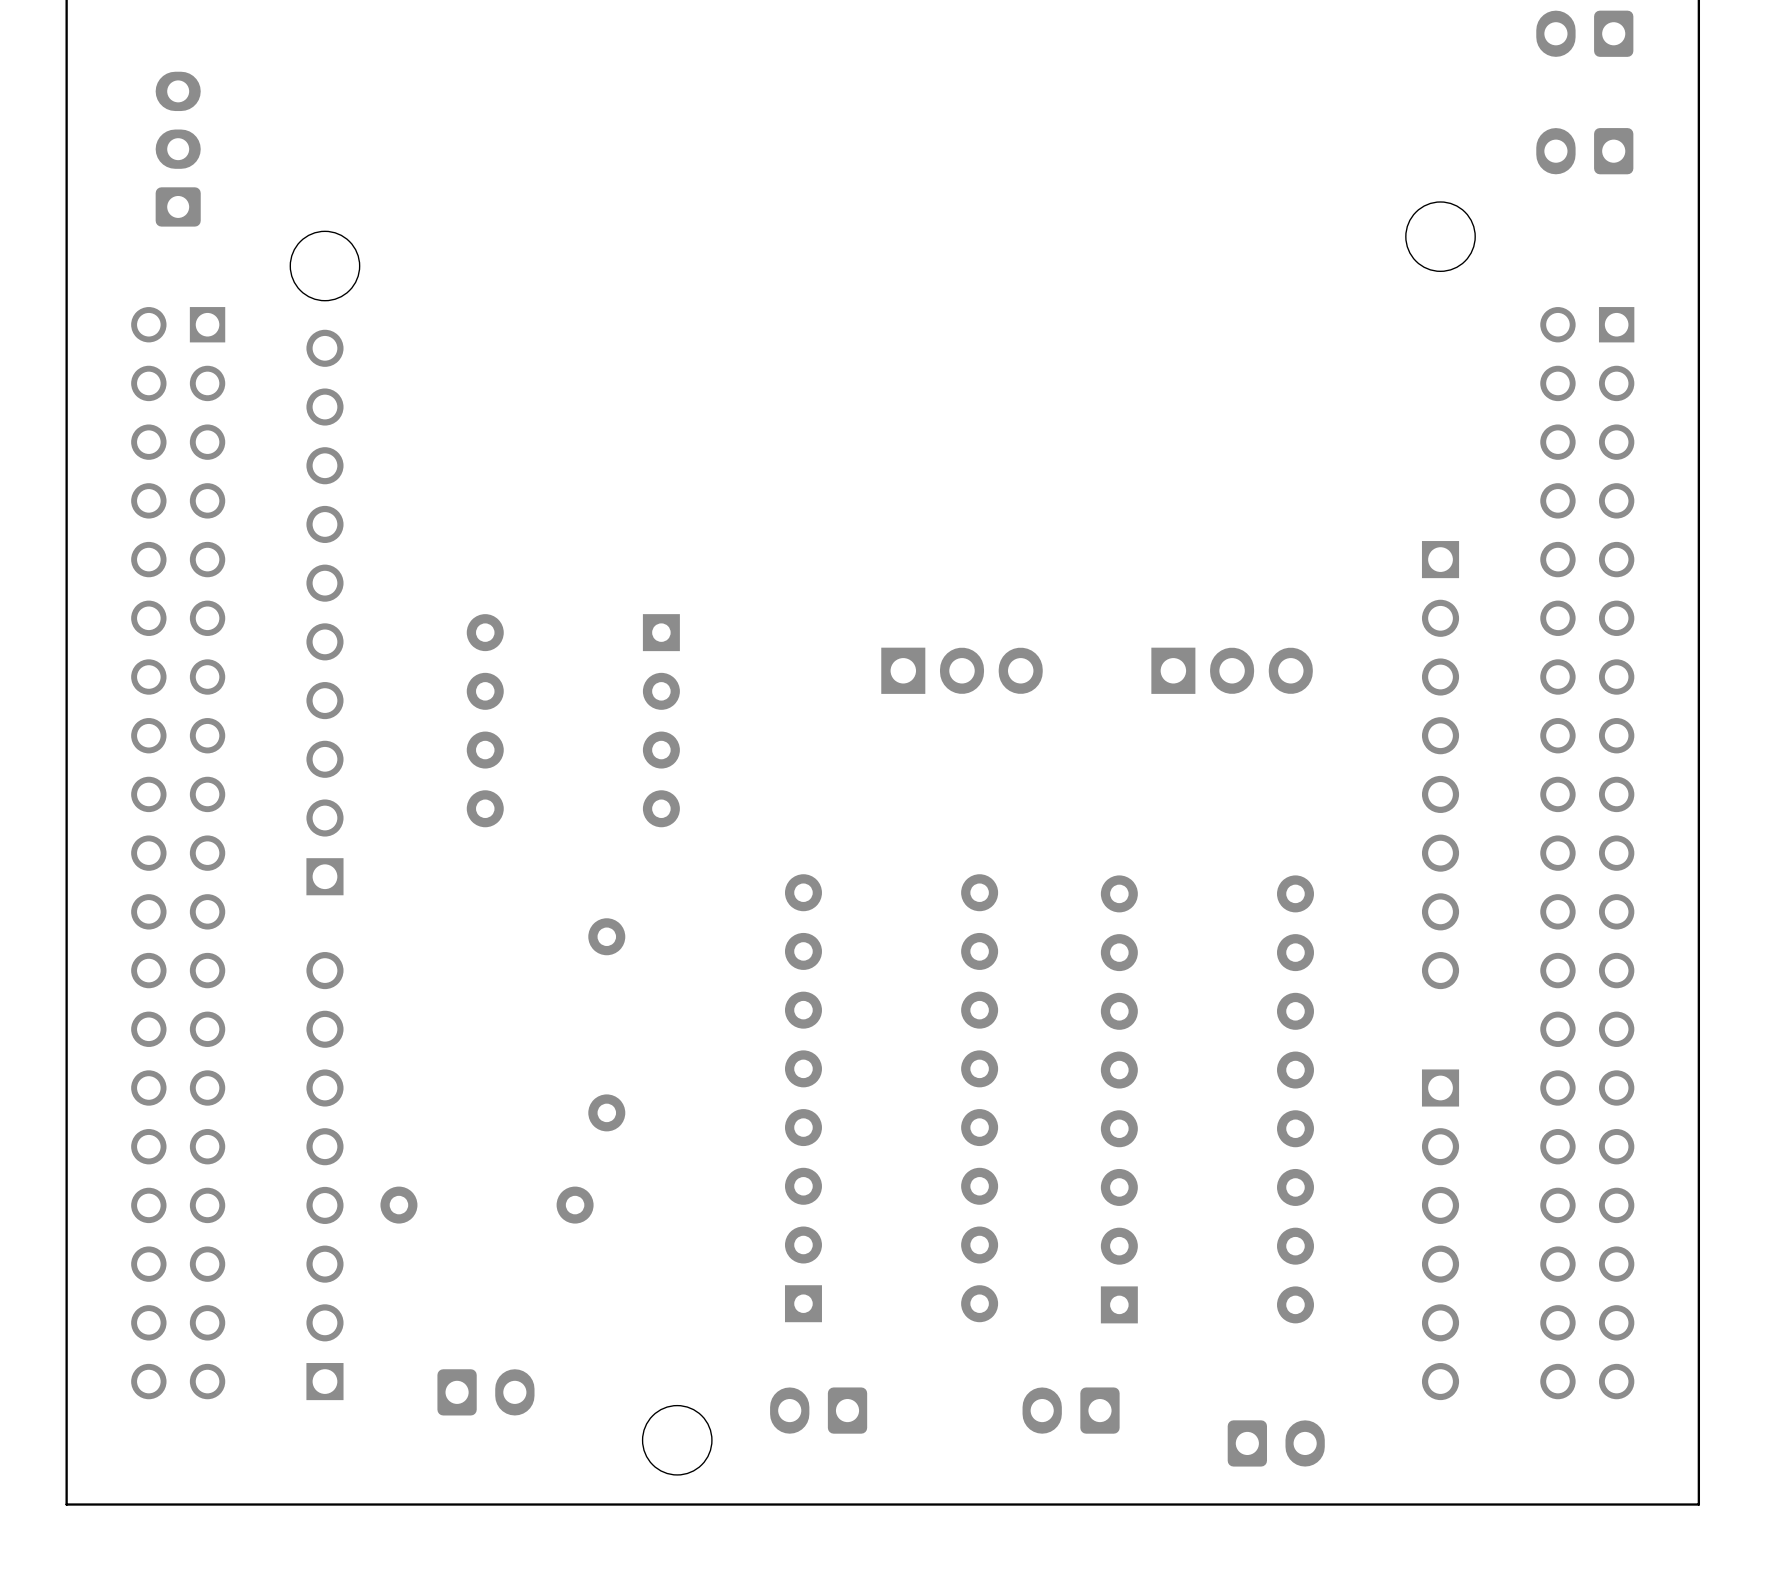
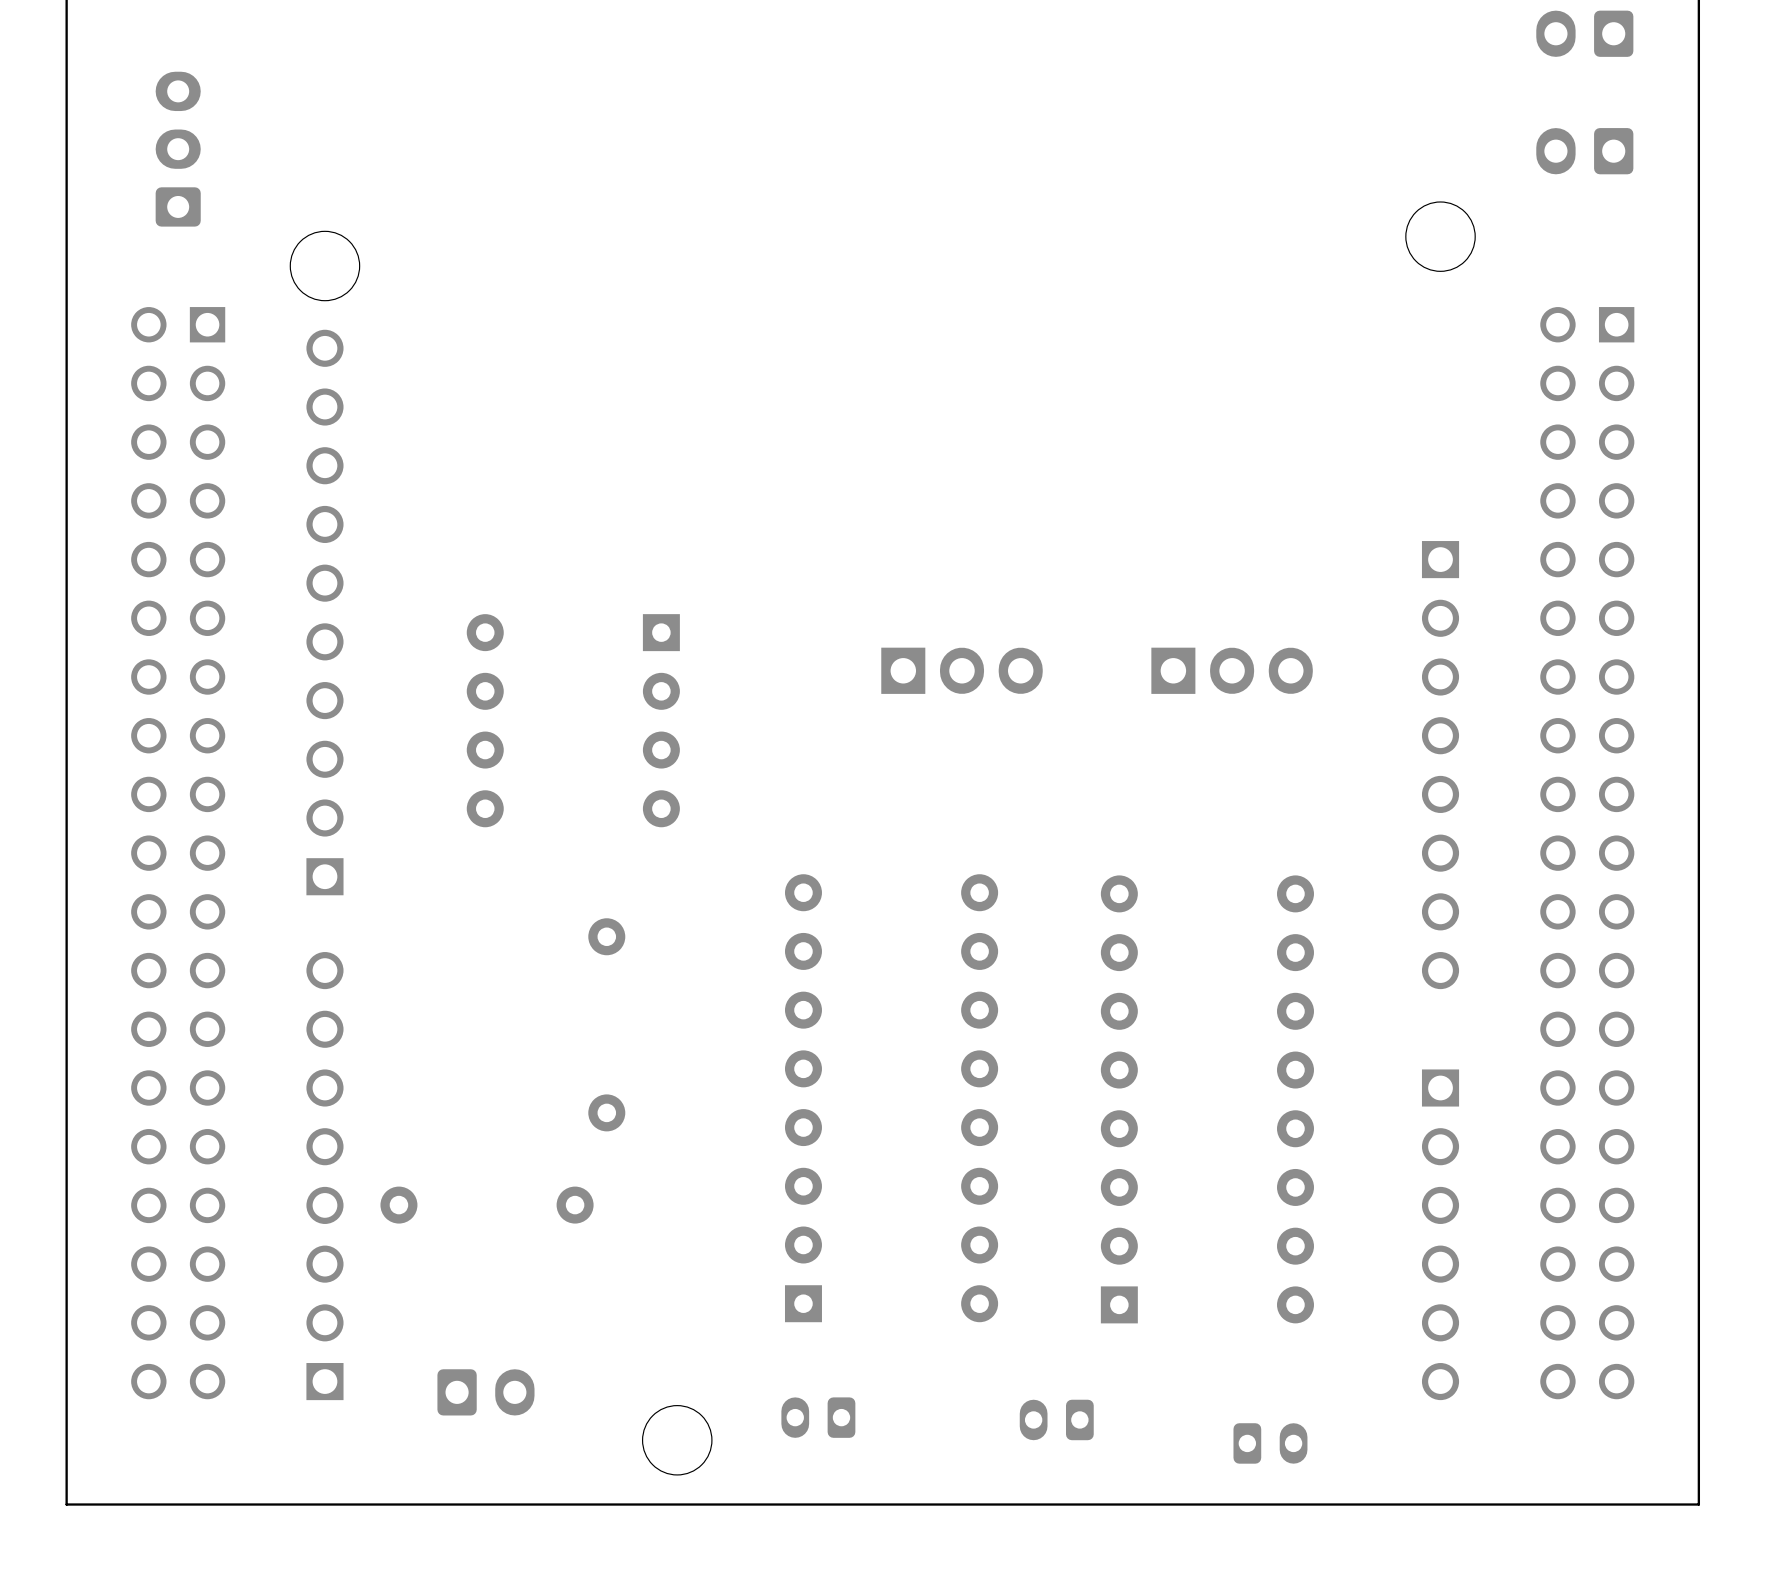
part footprint: [770, 1387, 868, 1434] -> [781, 1397, 856, 1438]
part footprint: [1022, 1387, 1120, 1434] -> [1019, 1399, 1094, 1441]
part footprint: [1227, 1420, 1325, 1467] -> [1233, 1423, 1308, 1464]

